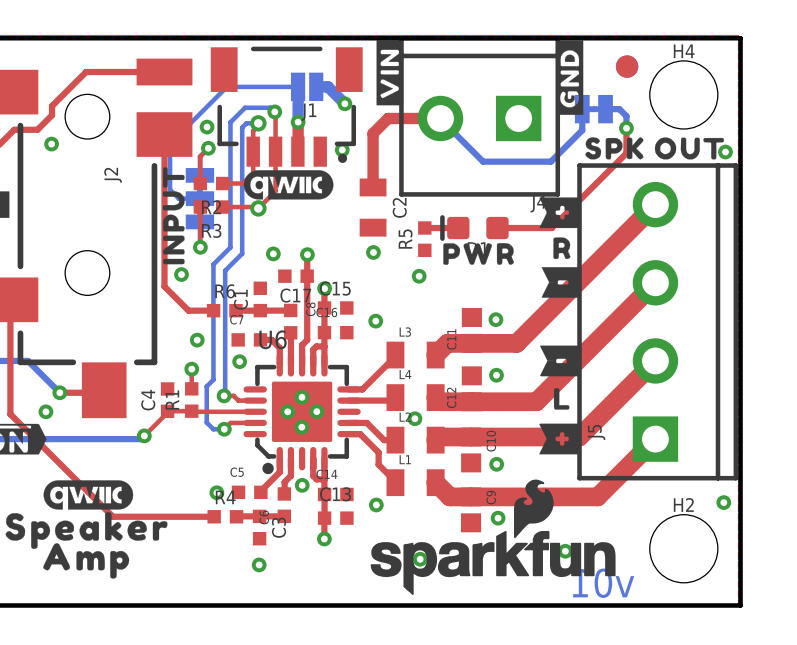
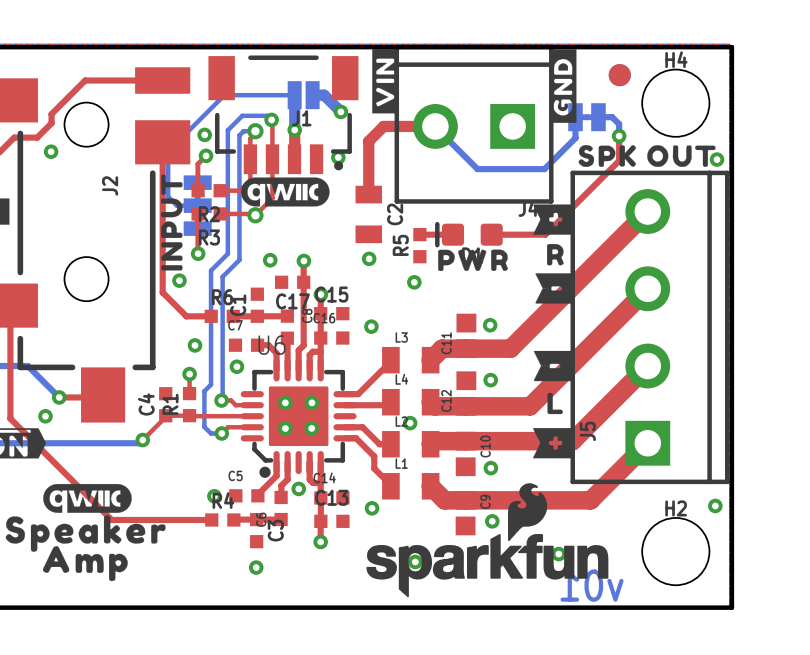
via: (301, 397) -> none
via: none -> (285, 402)
via: none -> (311, 402)
via: (287, 411) -> none
via: (316, 411) -> none
via: none -> (285, 428)
via: none -> (311, 428)
via: (301, 427) -> none

